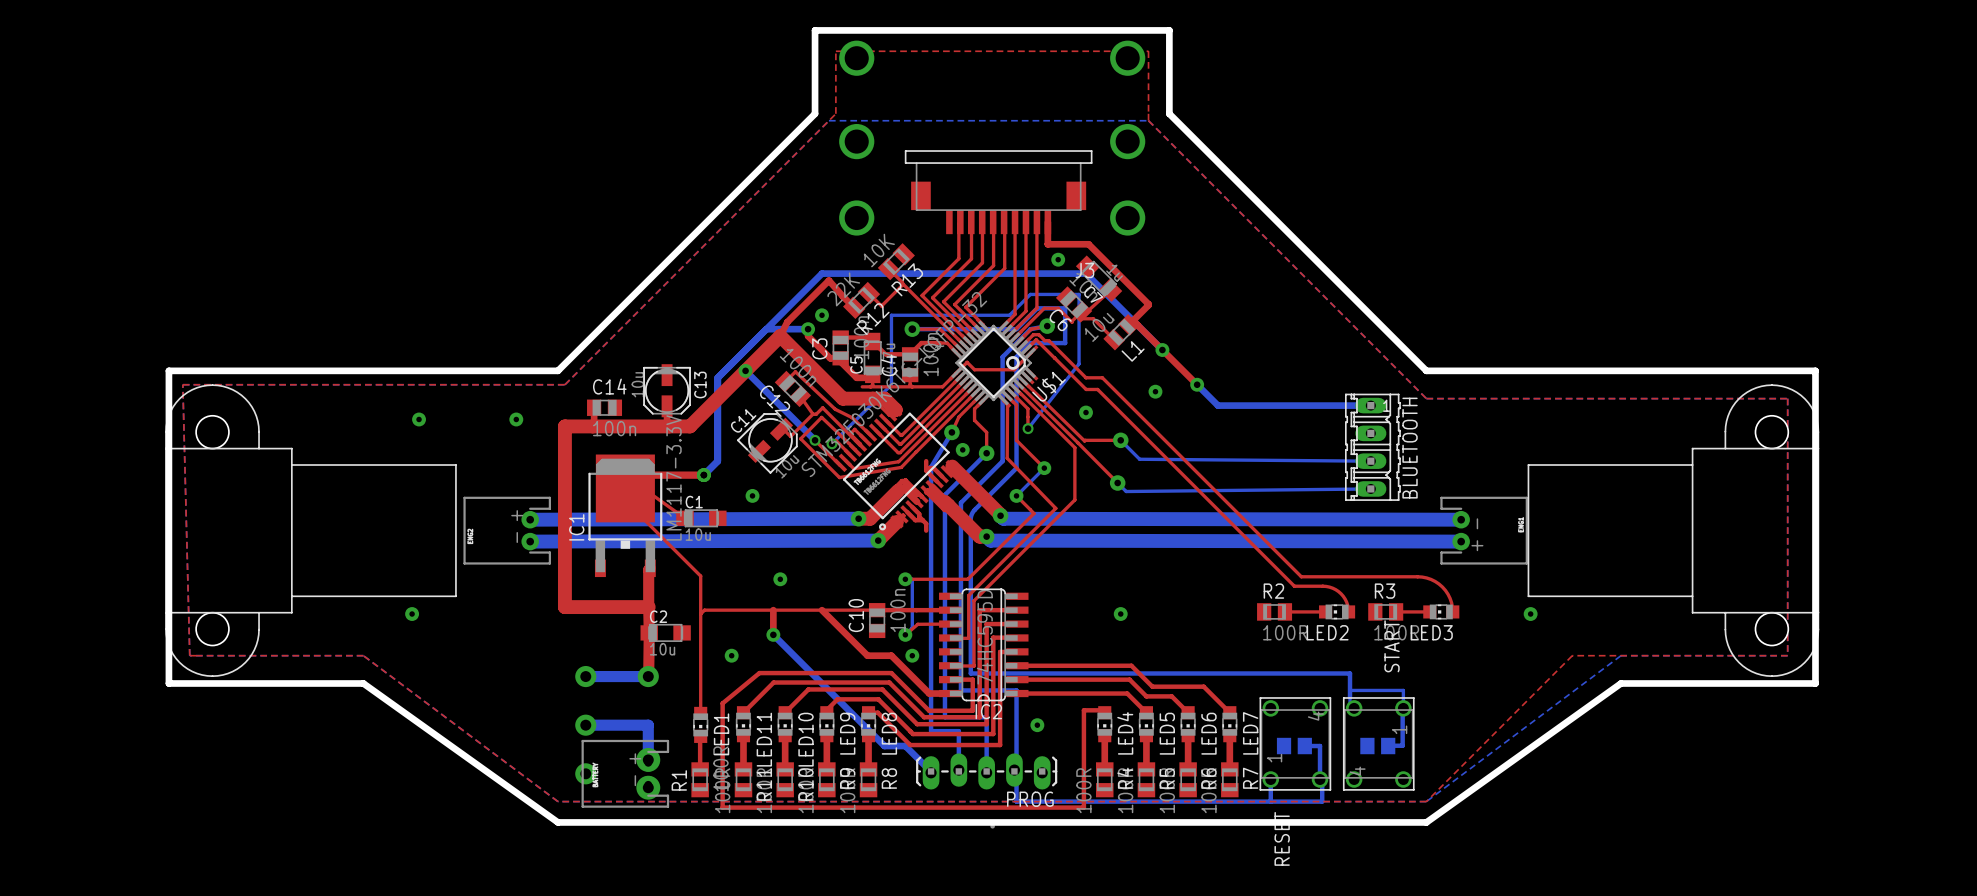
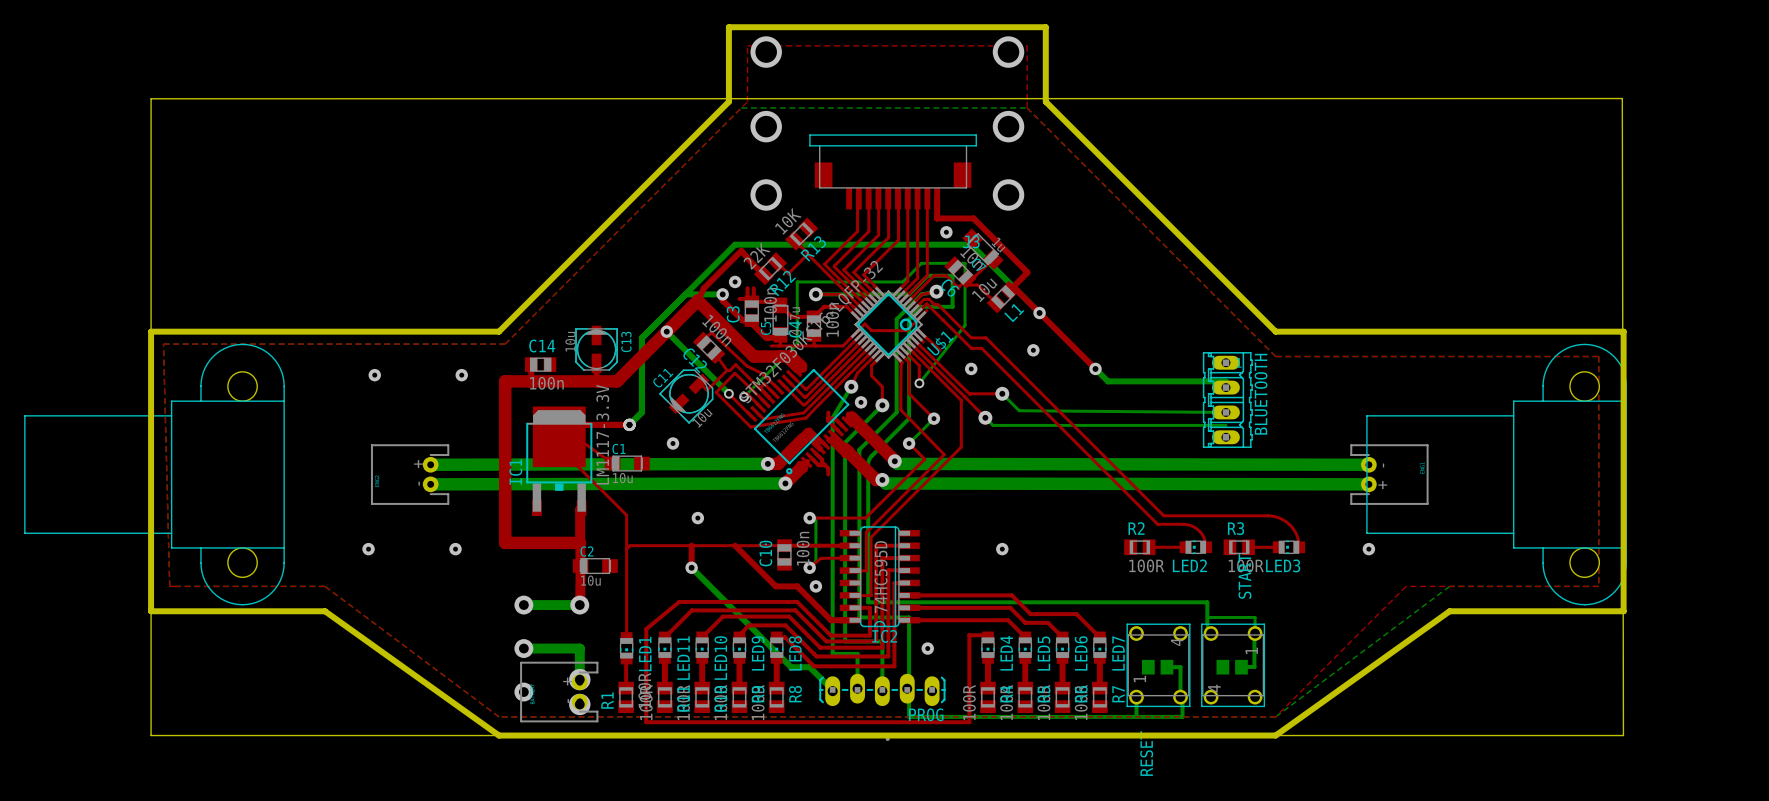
top track: none -> (747, 288) (747, 300)
top track: none -> (753, 288) (753, 300)
top track: none -> (739, 298) (748, 298)
board edge: none -> (151, 331) (151, 98) (1622, 98) (1623, 735) (1275, 735)
top track: none -> (922, 333) (940, 350)
bottom track: (1197, 384) (1218, 405) (1370, 405) -> none
top track: none -> (1070, 344) (1095, 368)
via position: (1197, 384) -> (1095, 368)
bottom track: none -> (1095, 368) (1107, 381) (1225, 381)
top track: (1078, 443) (1117, 482) -> (964, 396) (985, 417)
bottom track: none -> (985, 417) (993, 425) (1225, 425)
bottom track: (1117, 482) (1126, 491) (1370, 488) -> none
via position: (1117, 482) -> (985, 417)
bottom track: (858, 518) (530, 519) -> (767, 463) (430, 464)
bottom track: (1003, 518) (1461, 519) -> (897, 463) (1368, 464)
part rotation: 0° (310, 530) -> 180° (154, 474)
part position: (507, 530) -> (410, 474)
part position: (1484, 530) -> (1389, 474)
bottom track: (878, 540) (530, 541) -> (785, 483) (430, 484)
bottom track: (990, 540) (1461, 541) -> (885, 483) (1368, 484)
via: none -> (455, 549)
via: (731, 655) -> none
board edge: none -> (151, 611) (151, 735) (499, 735)

